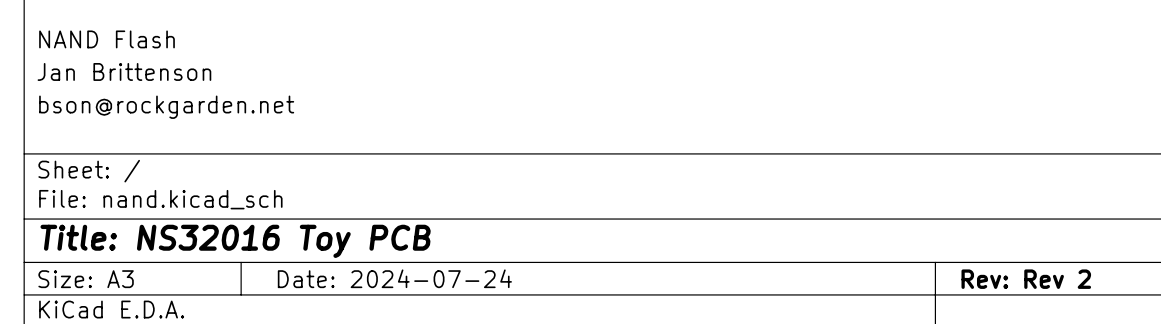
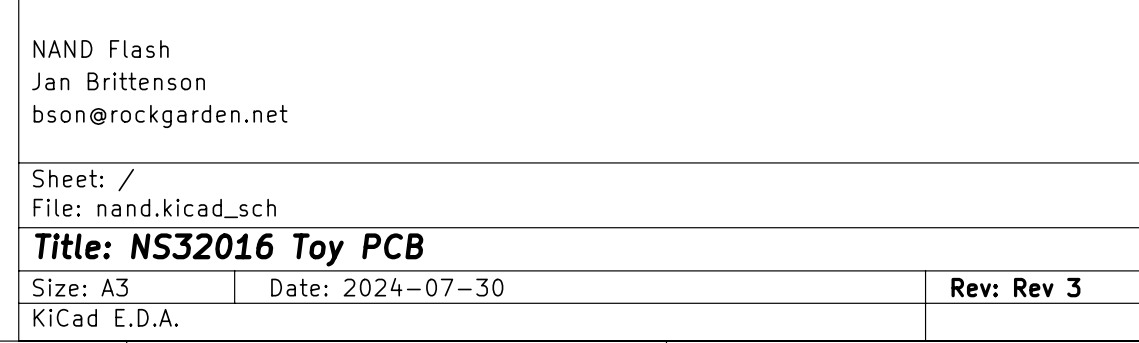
title block: Date: 2024-07-24 (394, 278) -> Date: 2024-07-30 (387, 287)
title block: Rev: Rev 2 (1026, 279) -> Rev: Rev 3 (1015, 287)

